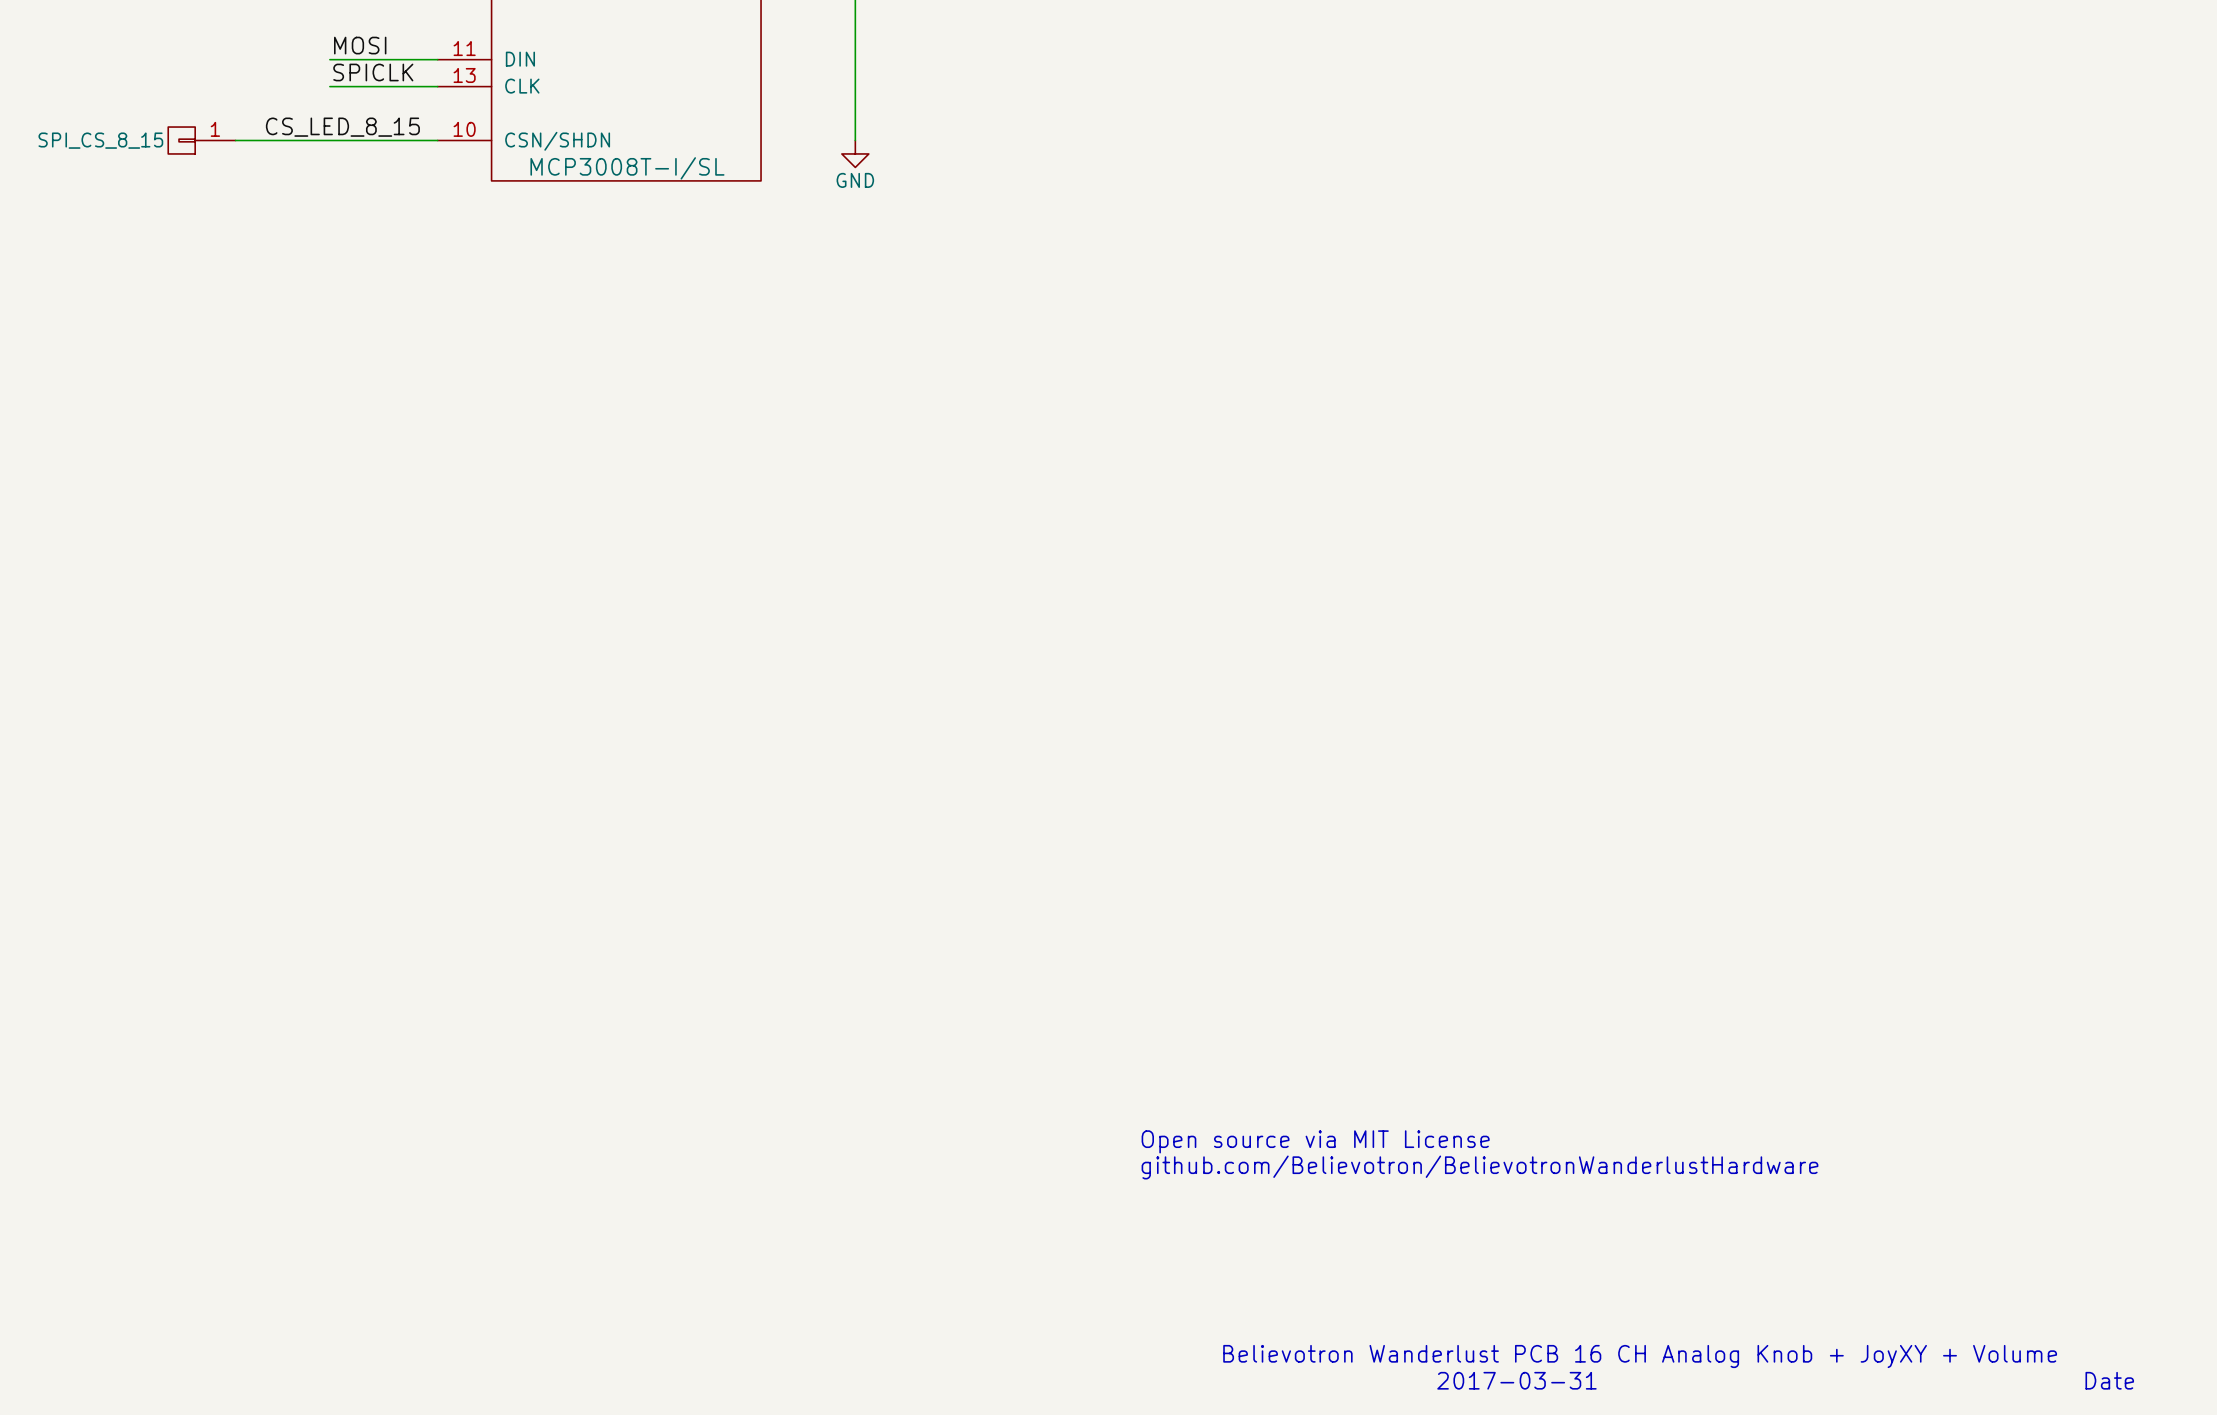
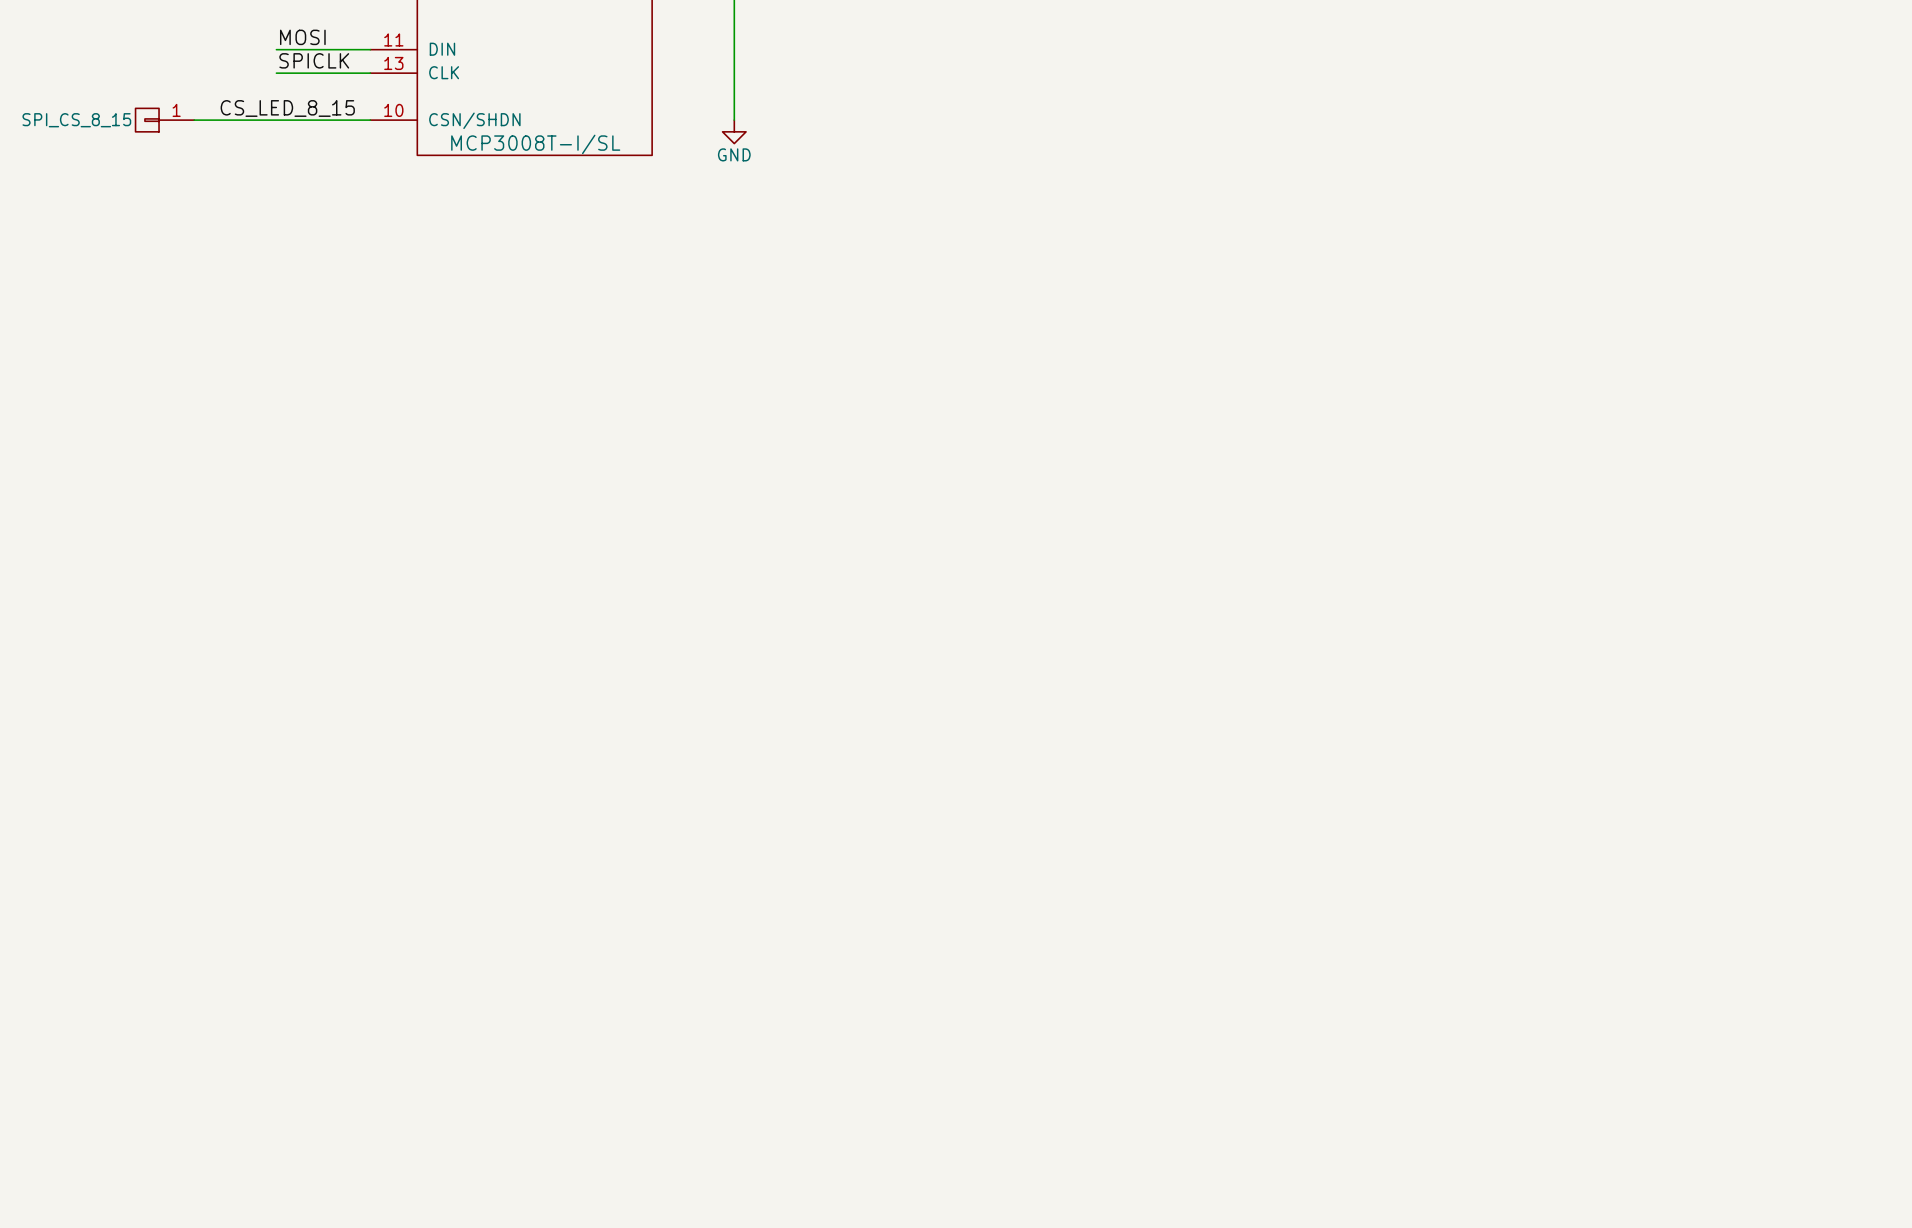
text: Open source via MIT License (1315, 1141) -> none
text: github.com/Believotron/BelievotronWanderlustHardware (1479, 1167) -> none
text: Believotron Wanderlust PCB 16 CH Analog Knob + JoyXY + Volume (1640, 1356) -> none
text: 2017-03-31 (1516, 1380) -> none
text: Date (2109, 1380) -> none

